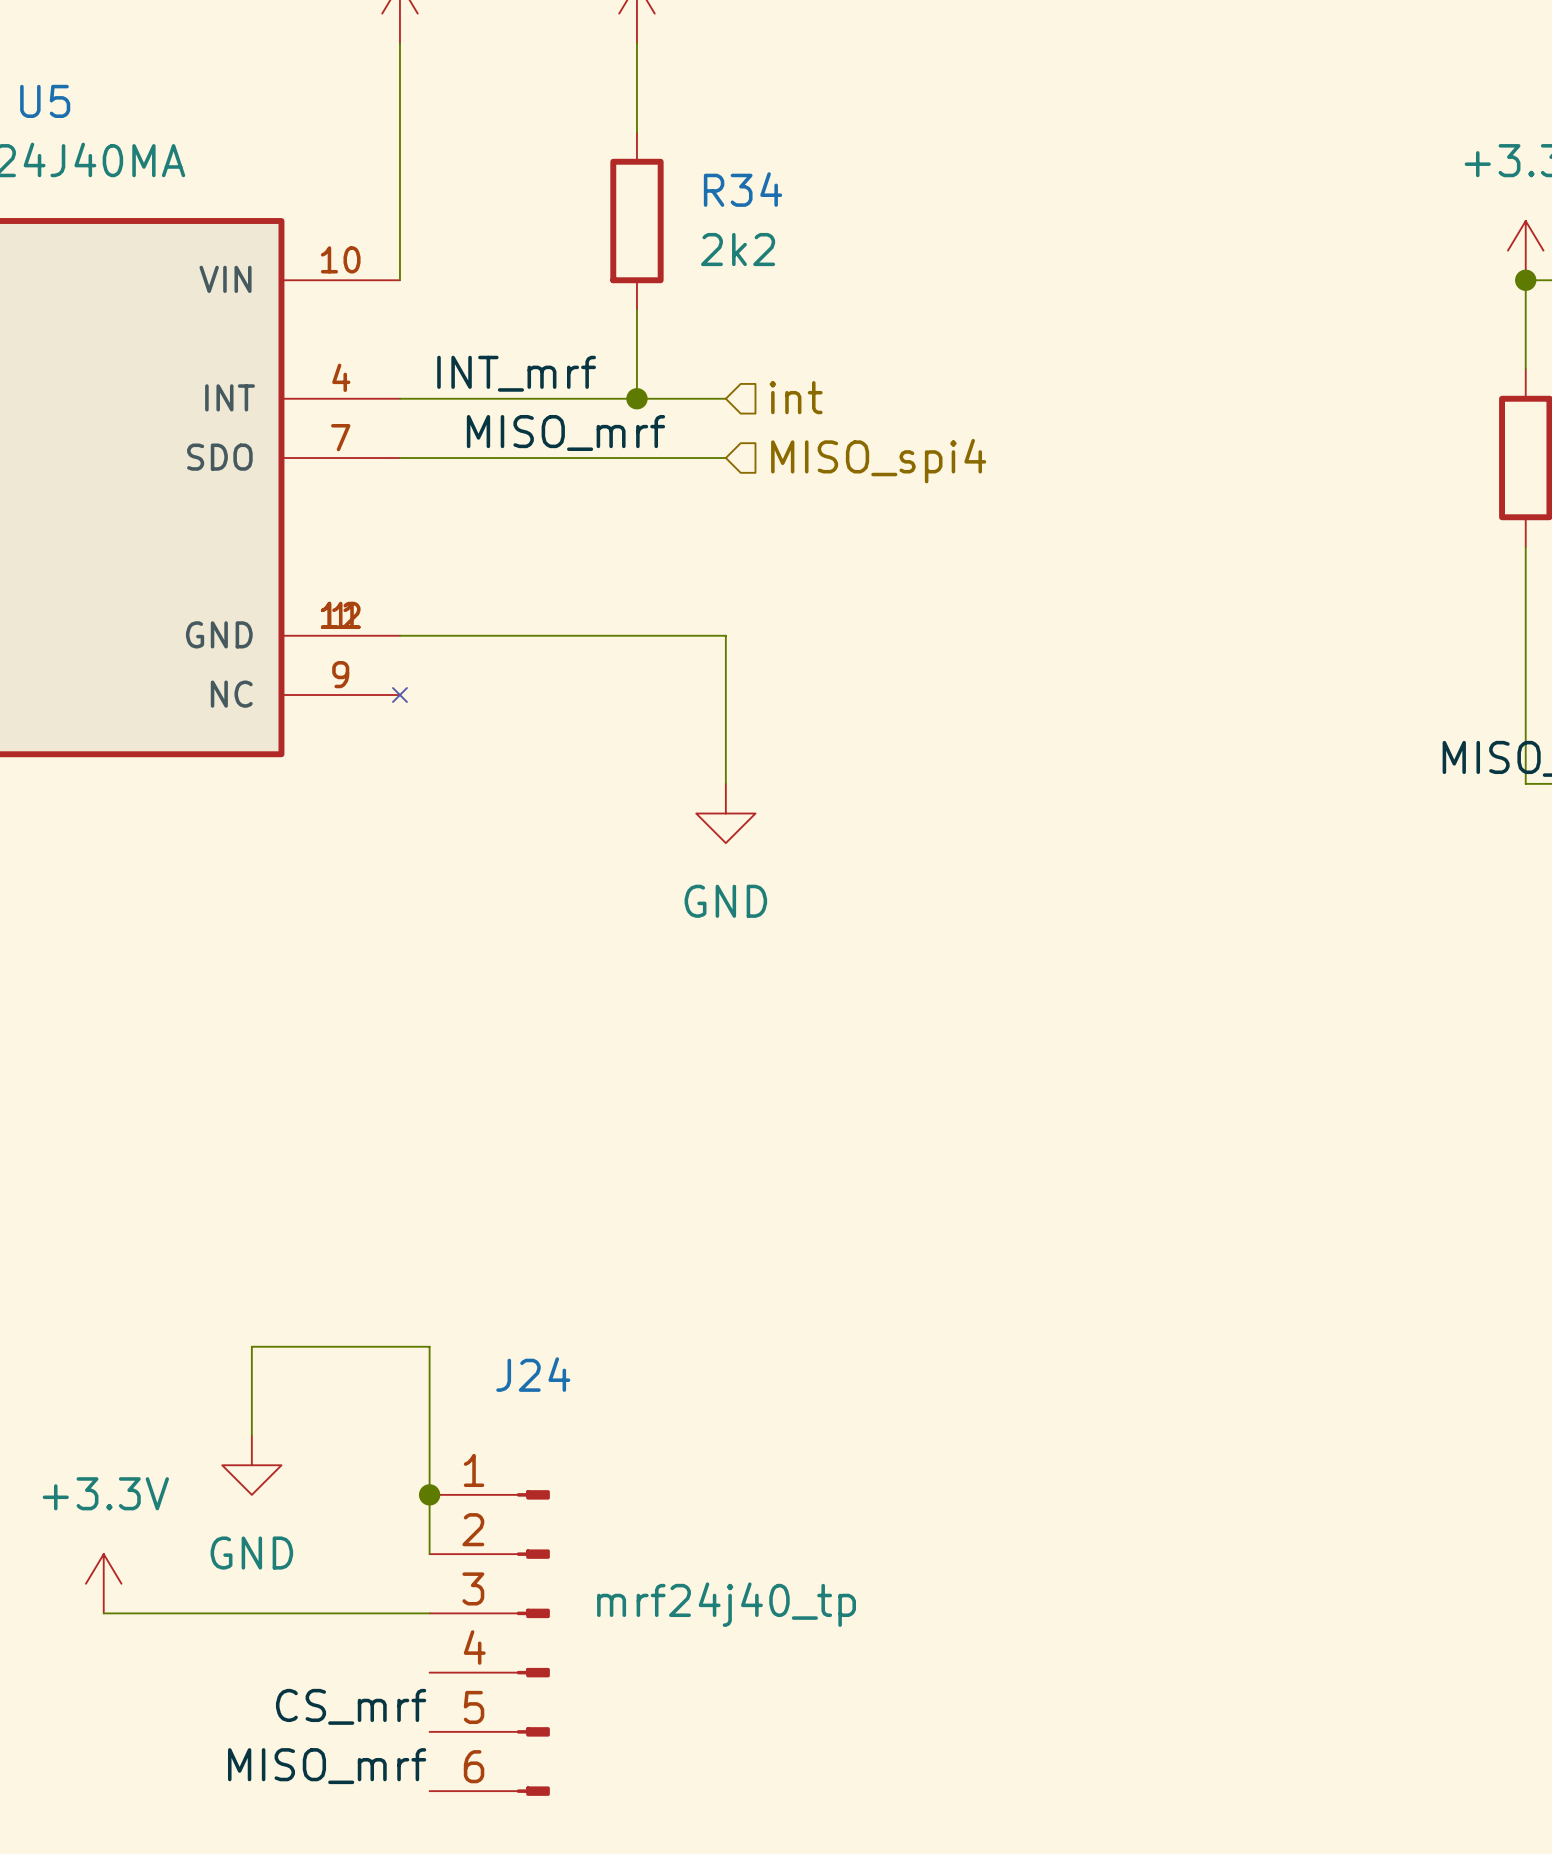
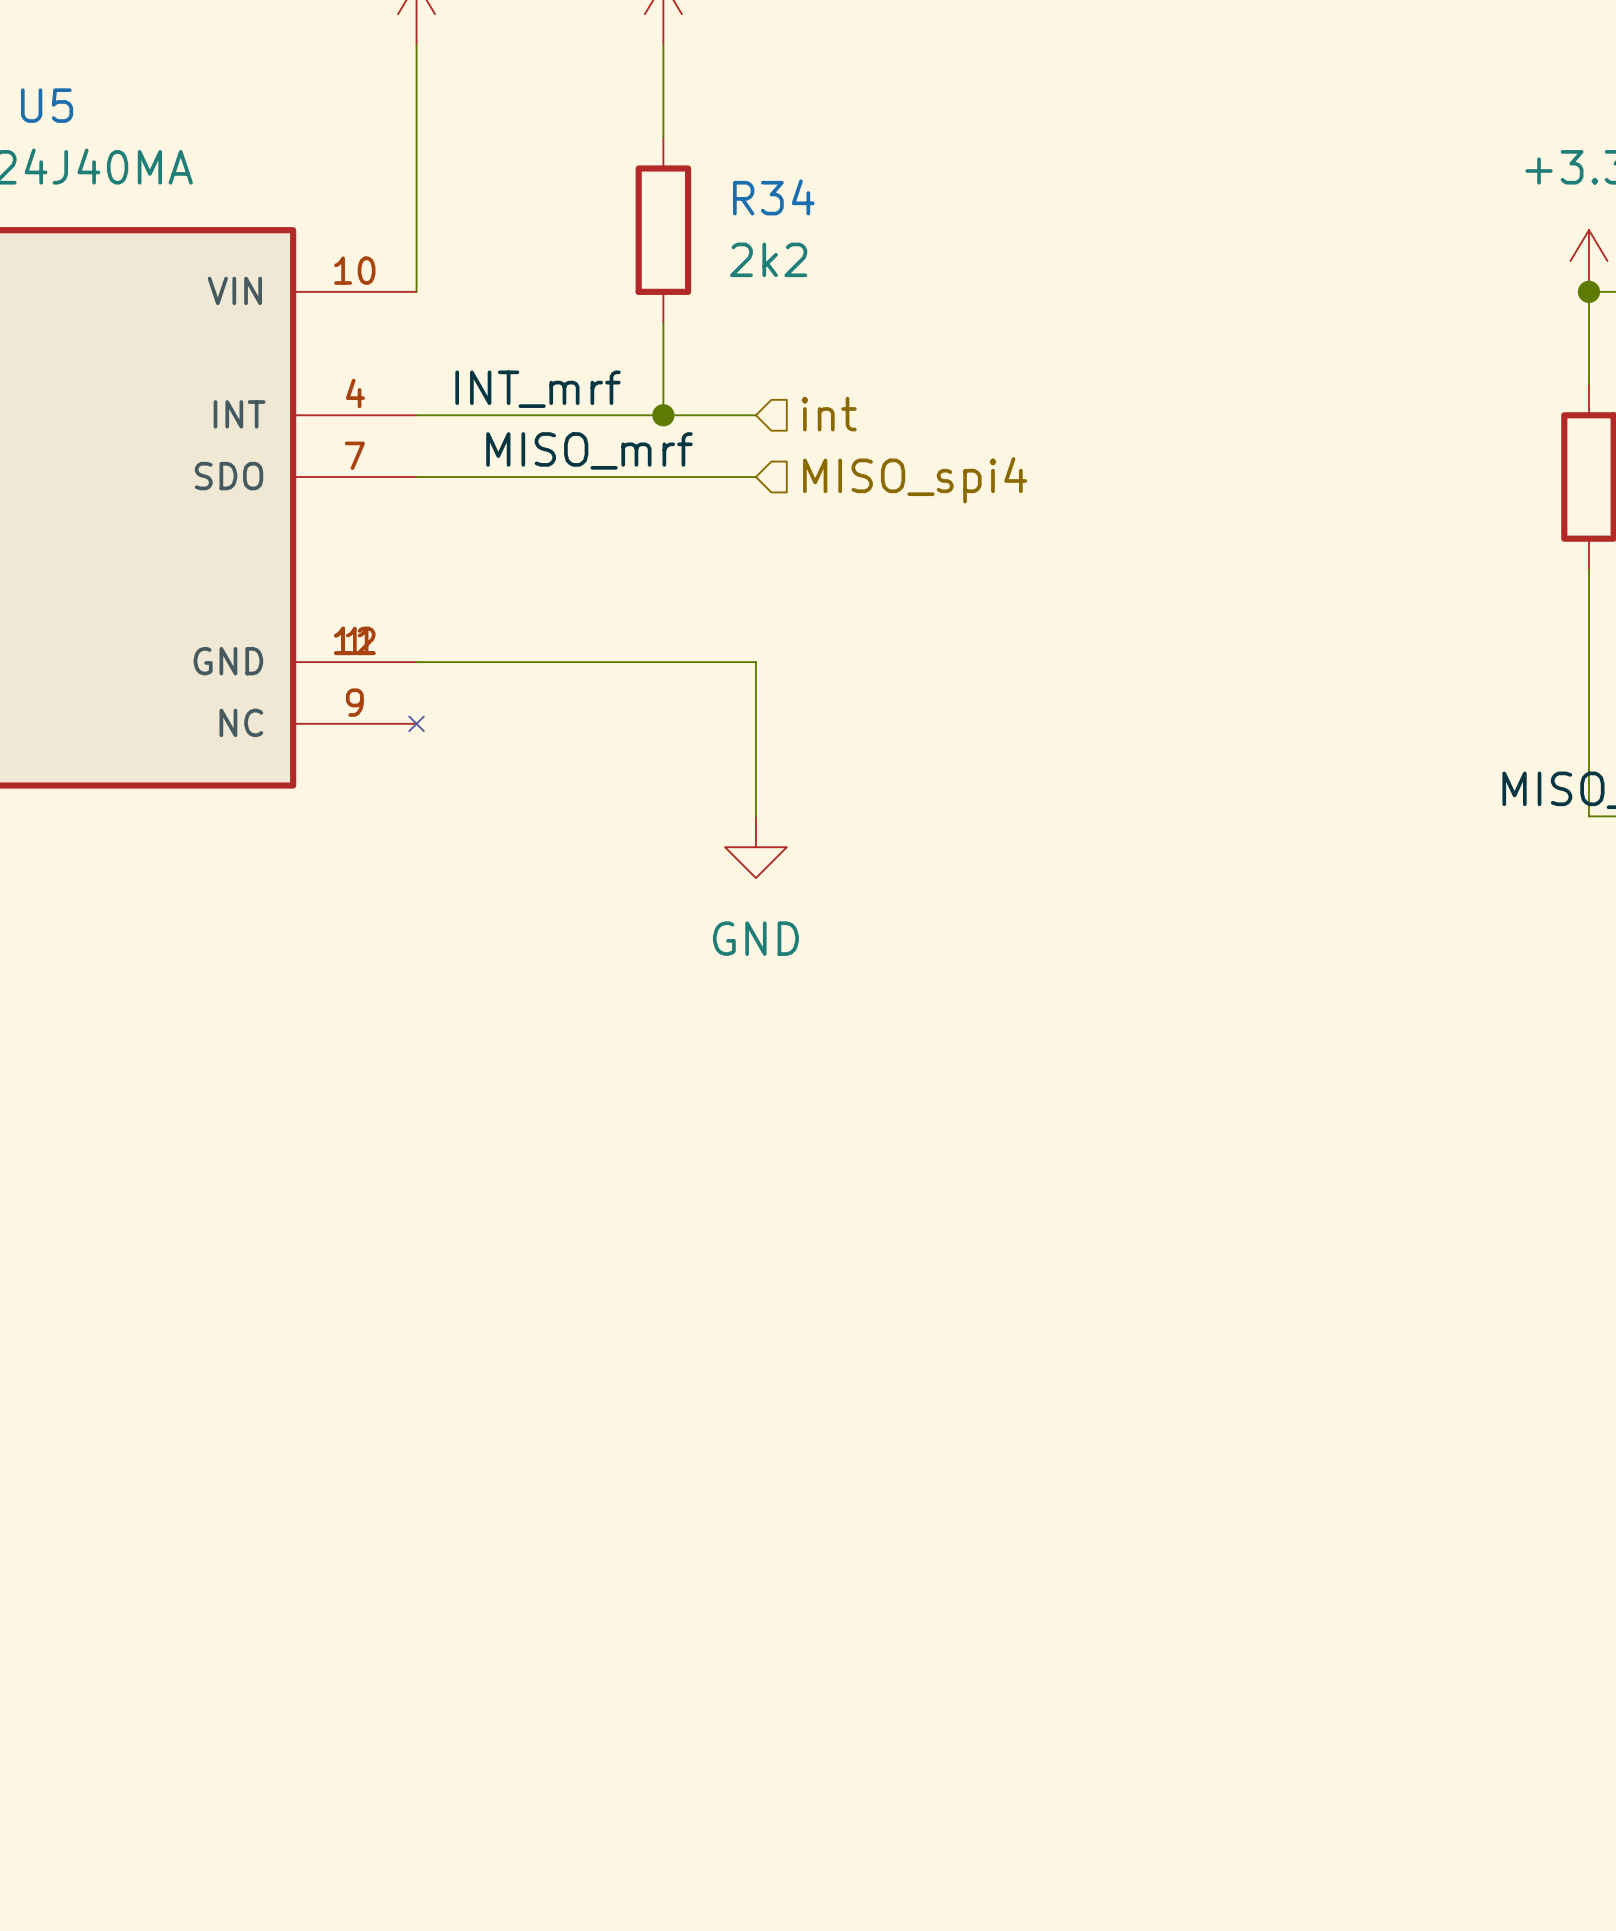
wire: (251, 1435) (251, 1346) (429, 1346) (429, 1554) -> none
power symbol: GND (251, 1465) -> none
junction: (429, 1494) -> none
power symbol: +3.3V (103, 1583) -> none
wire: (103, 1613) (429, 1613) -> none
J24: mrf24j40_tp (489, 1643) -> none
label: CS_mrf (351, 1706) -> none
label: MISO_mrf (327, 1766) -> none

